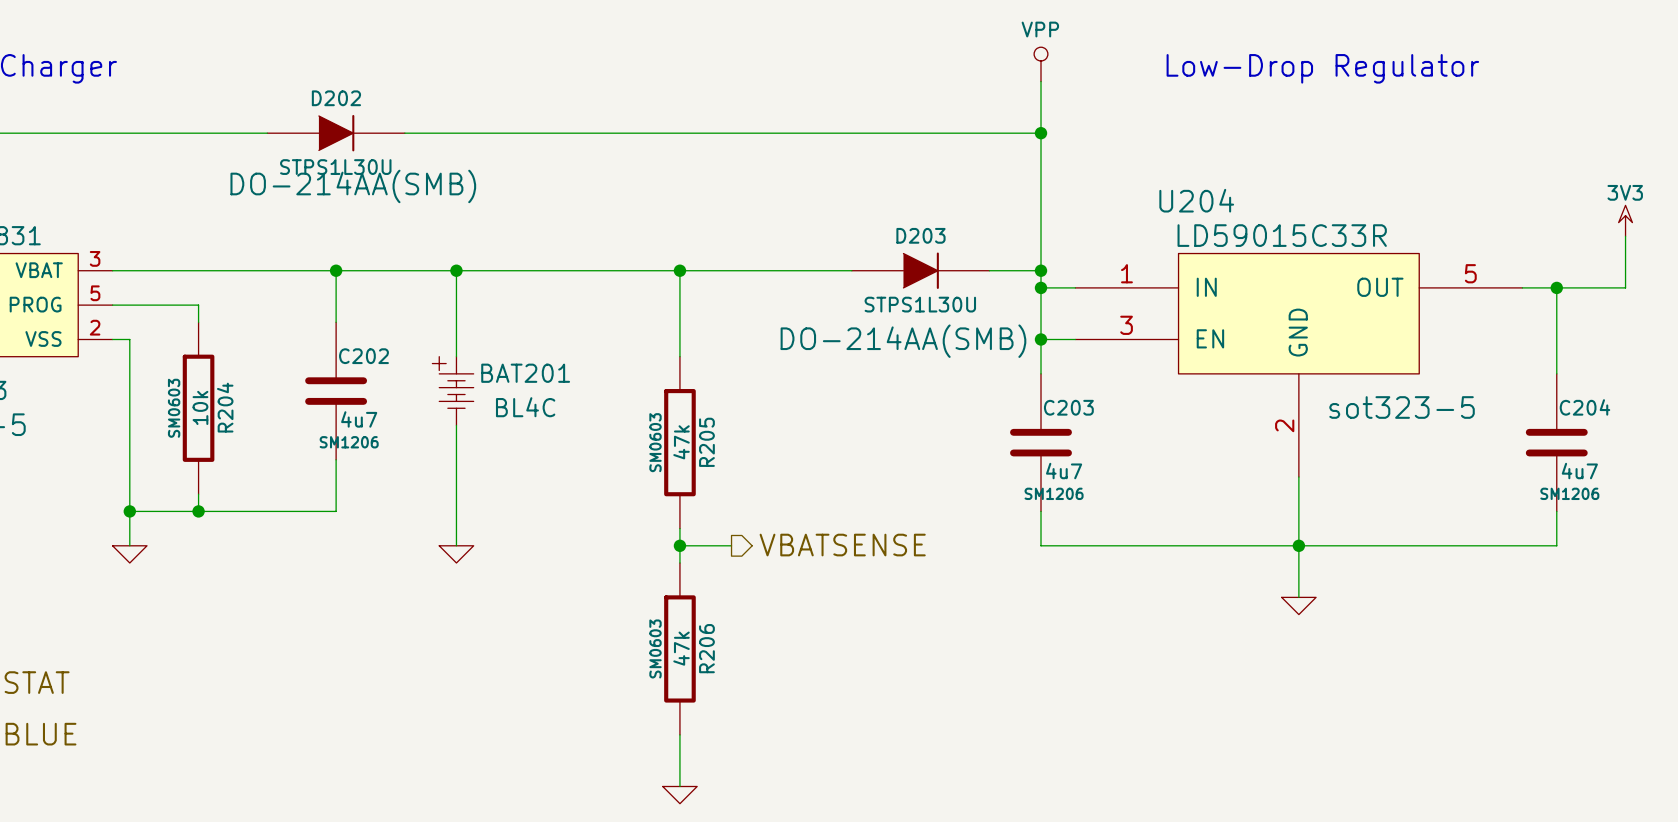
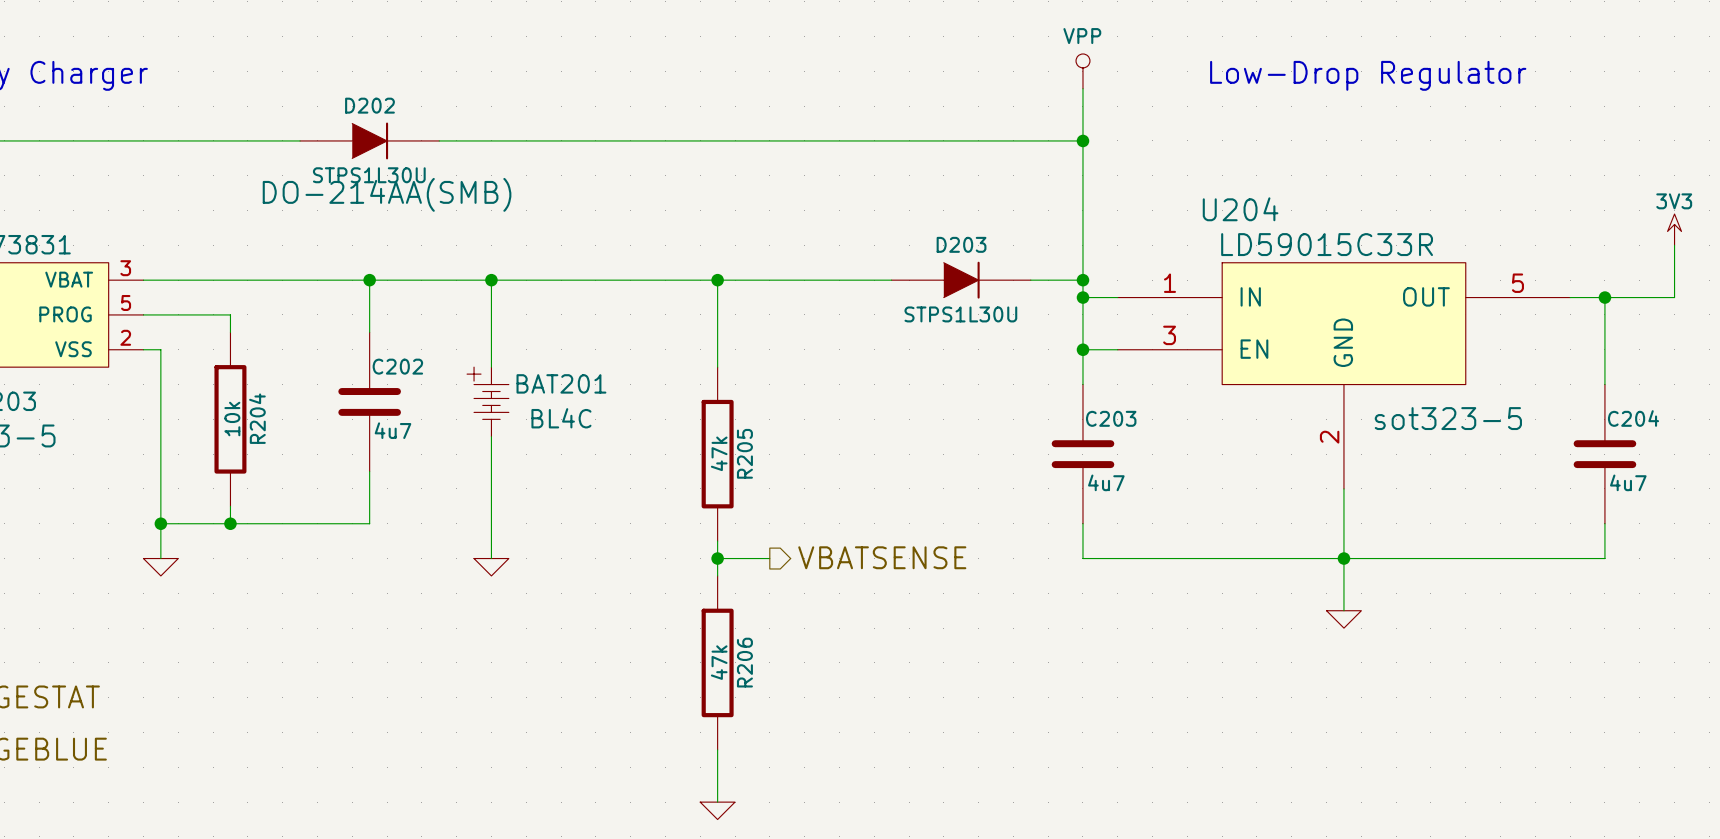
D203 text: DO-214AA(SMB) (903, 341) -> none
R204 text: SM0603 (174, 408) -> none
C202 text: SM1206 (349, 442) -> none
R205 text: SM0603 (655, 442) -> none
C203 text: SM1206 (1054, 493) -> none
C204 text: SM1206 (1569, 493) -> none
R206 text: SM0603 (655, 648) -> none

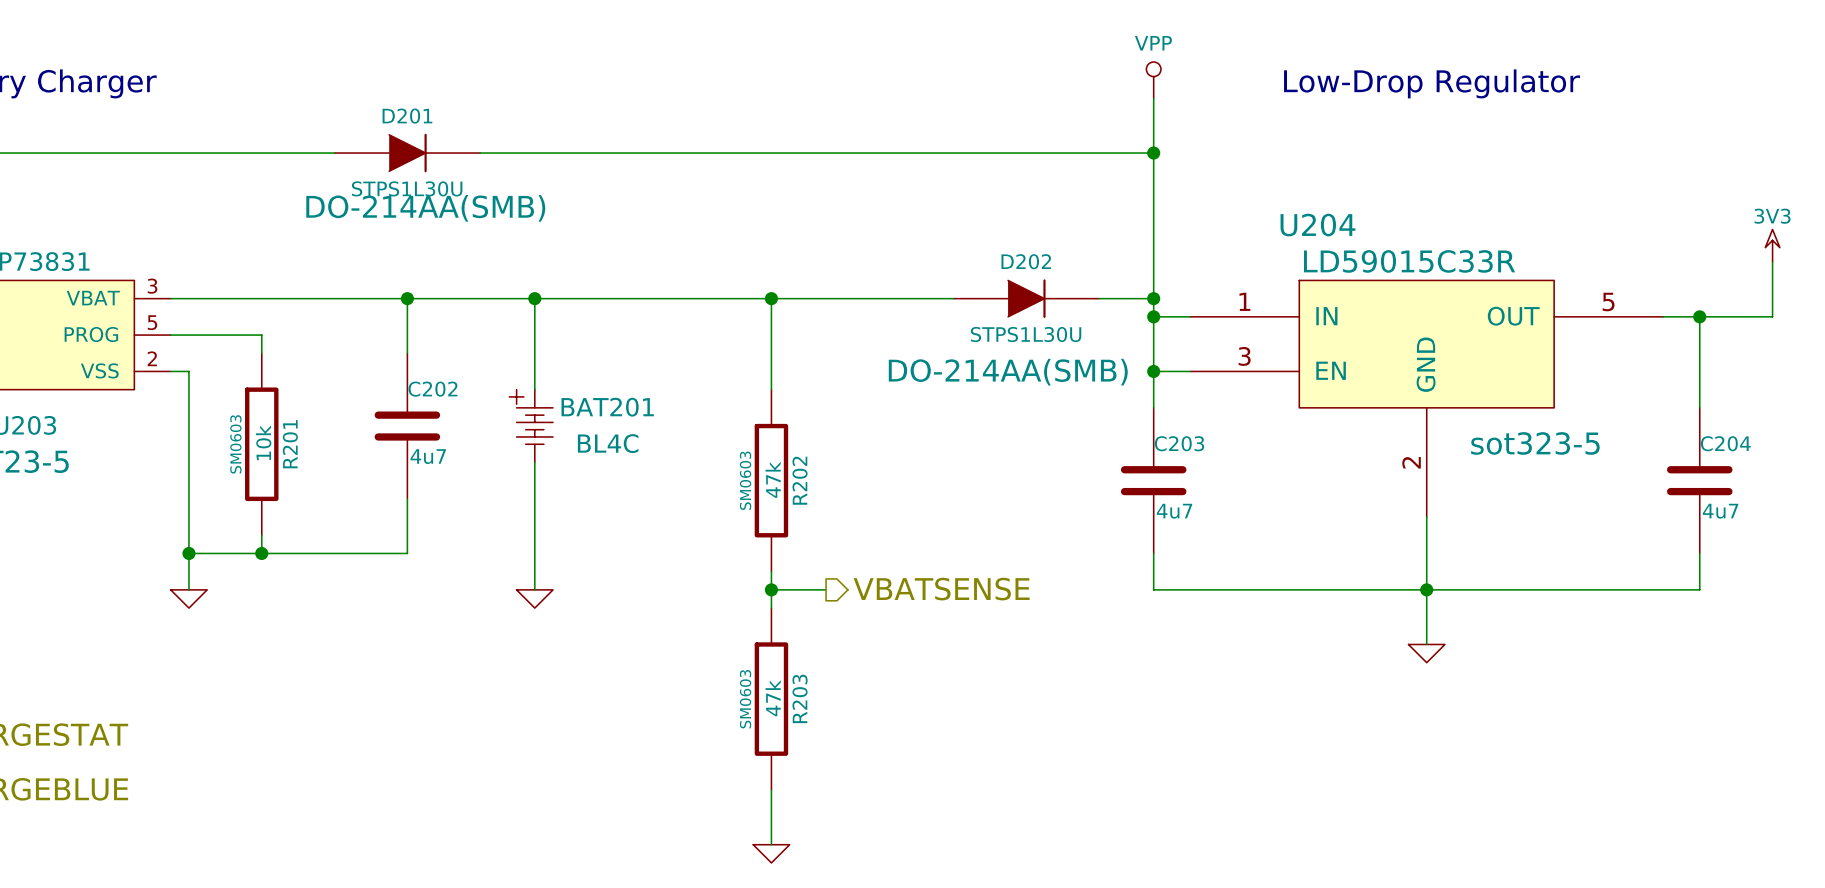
D202 name: D202 (369, 105) -> D201 (407, 116)
D203 name: D203 (961, 244) -> D202 (1026, 261)
D203 text: none -> DO-214AA(SMB) (1008, 372)
R204 name: R204 (257, 418) -> R201 (290, 444)
R204 text: none -> SM0603 (235, 444)
R205 name: R205 (744, 453) -> R202 (800, 480)
R205 text: none -> SM0603 (745, 480)
R206 text: none -> SM0603 (745, 699)
R206 name: R206 (744, 662) -> R203 (800, 698)

